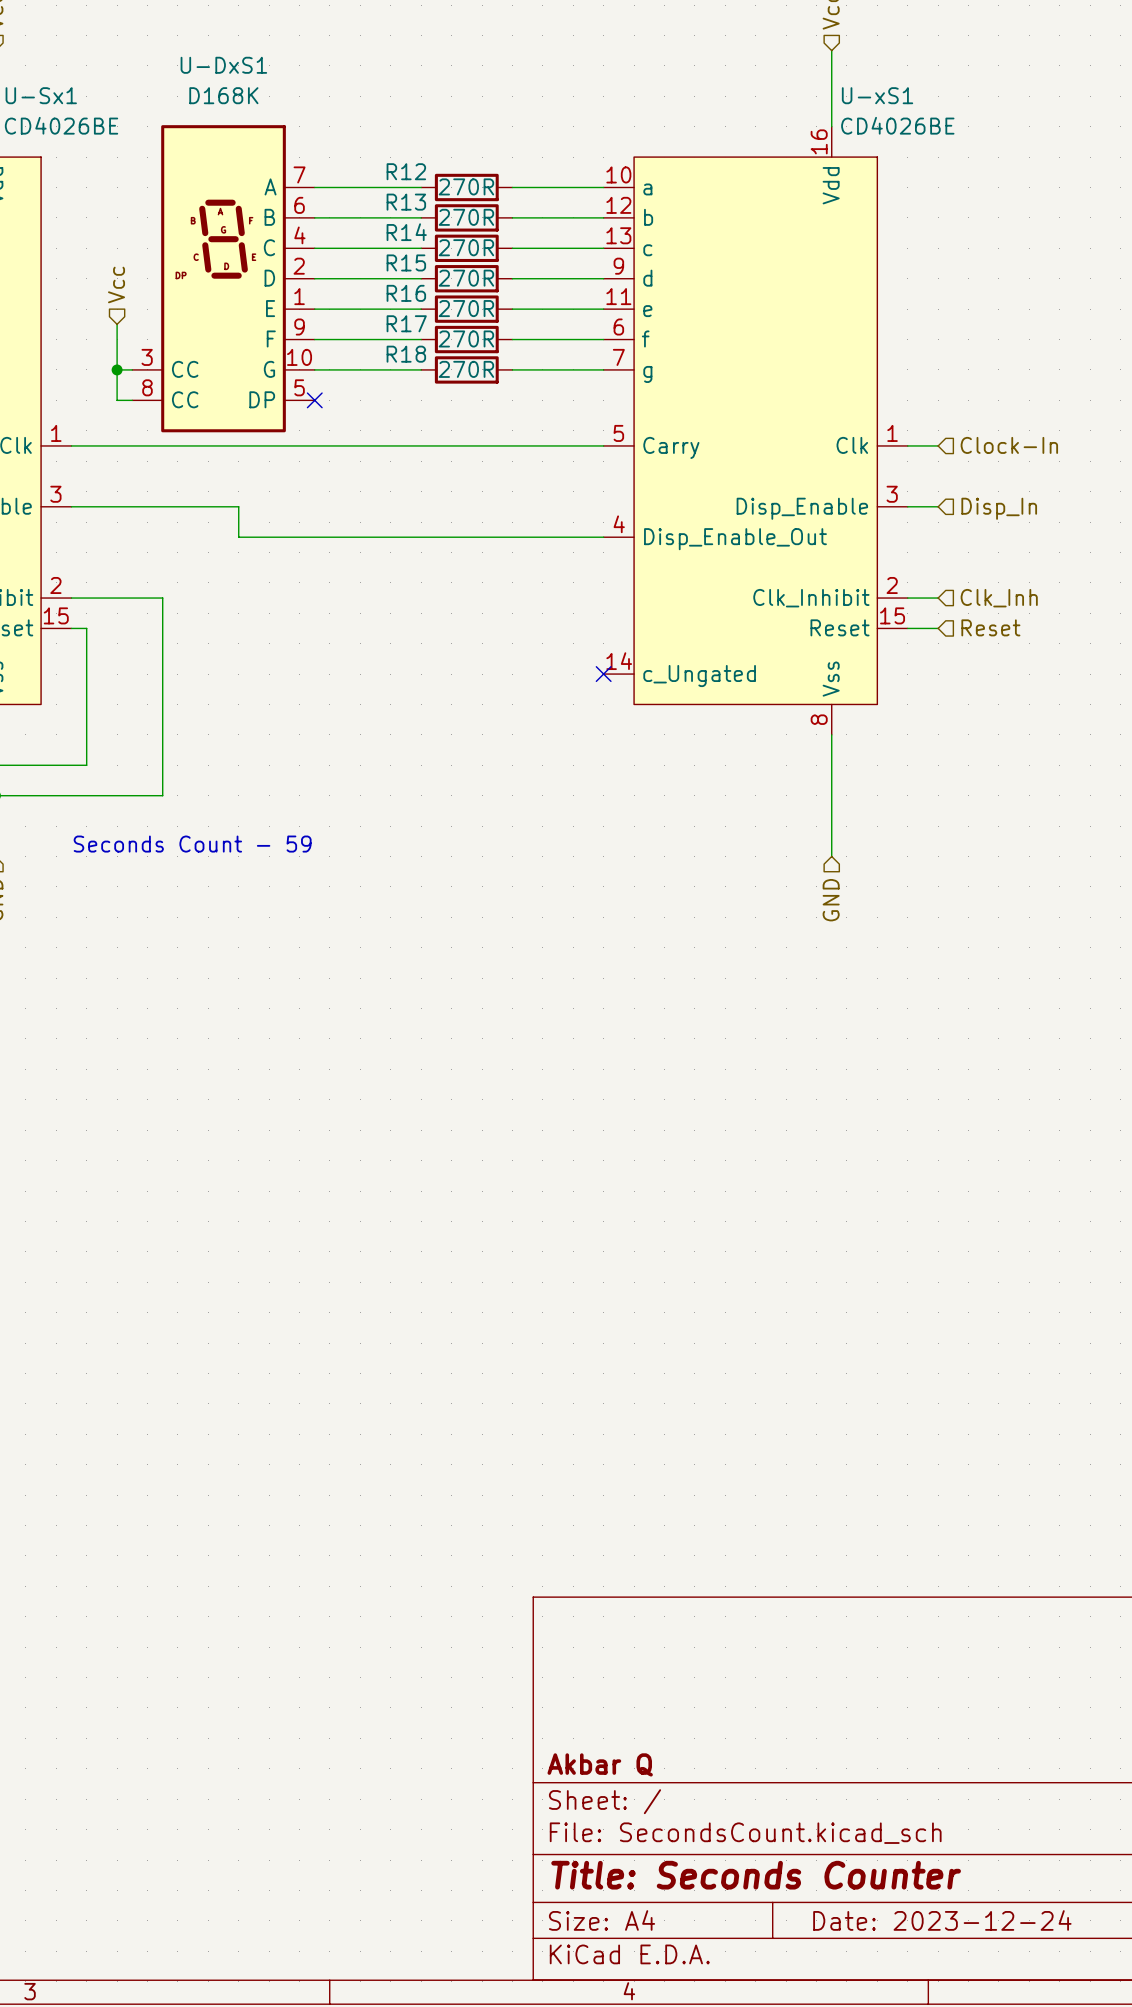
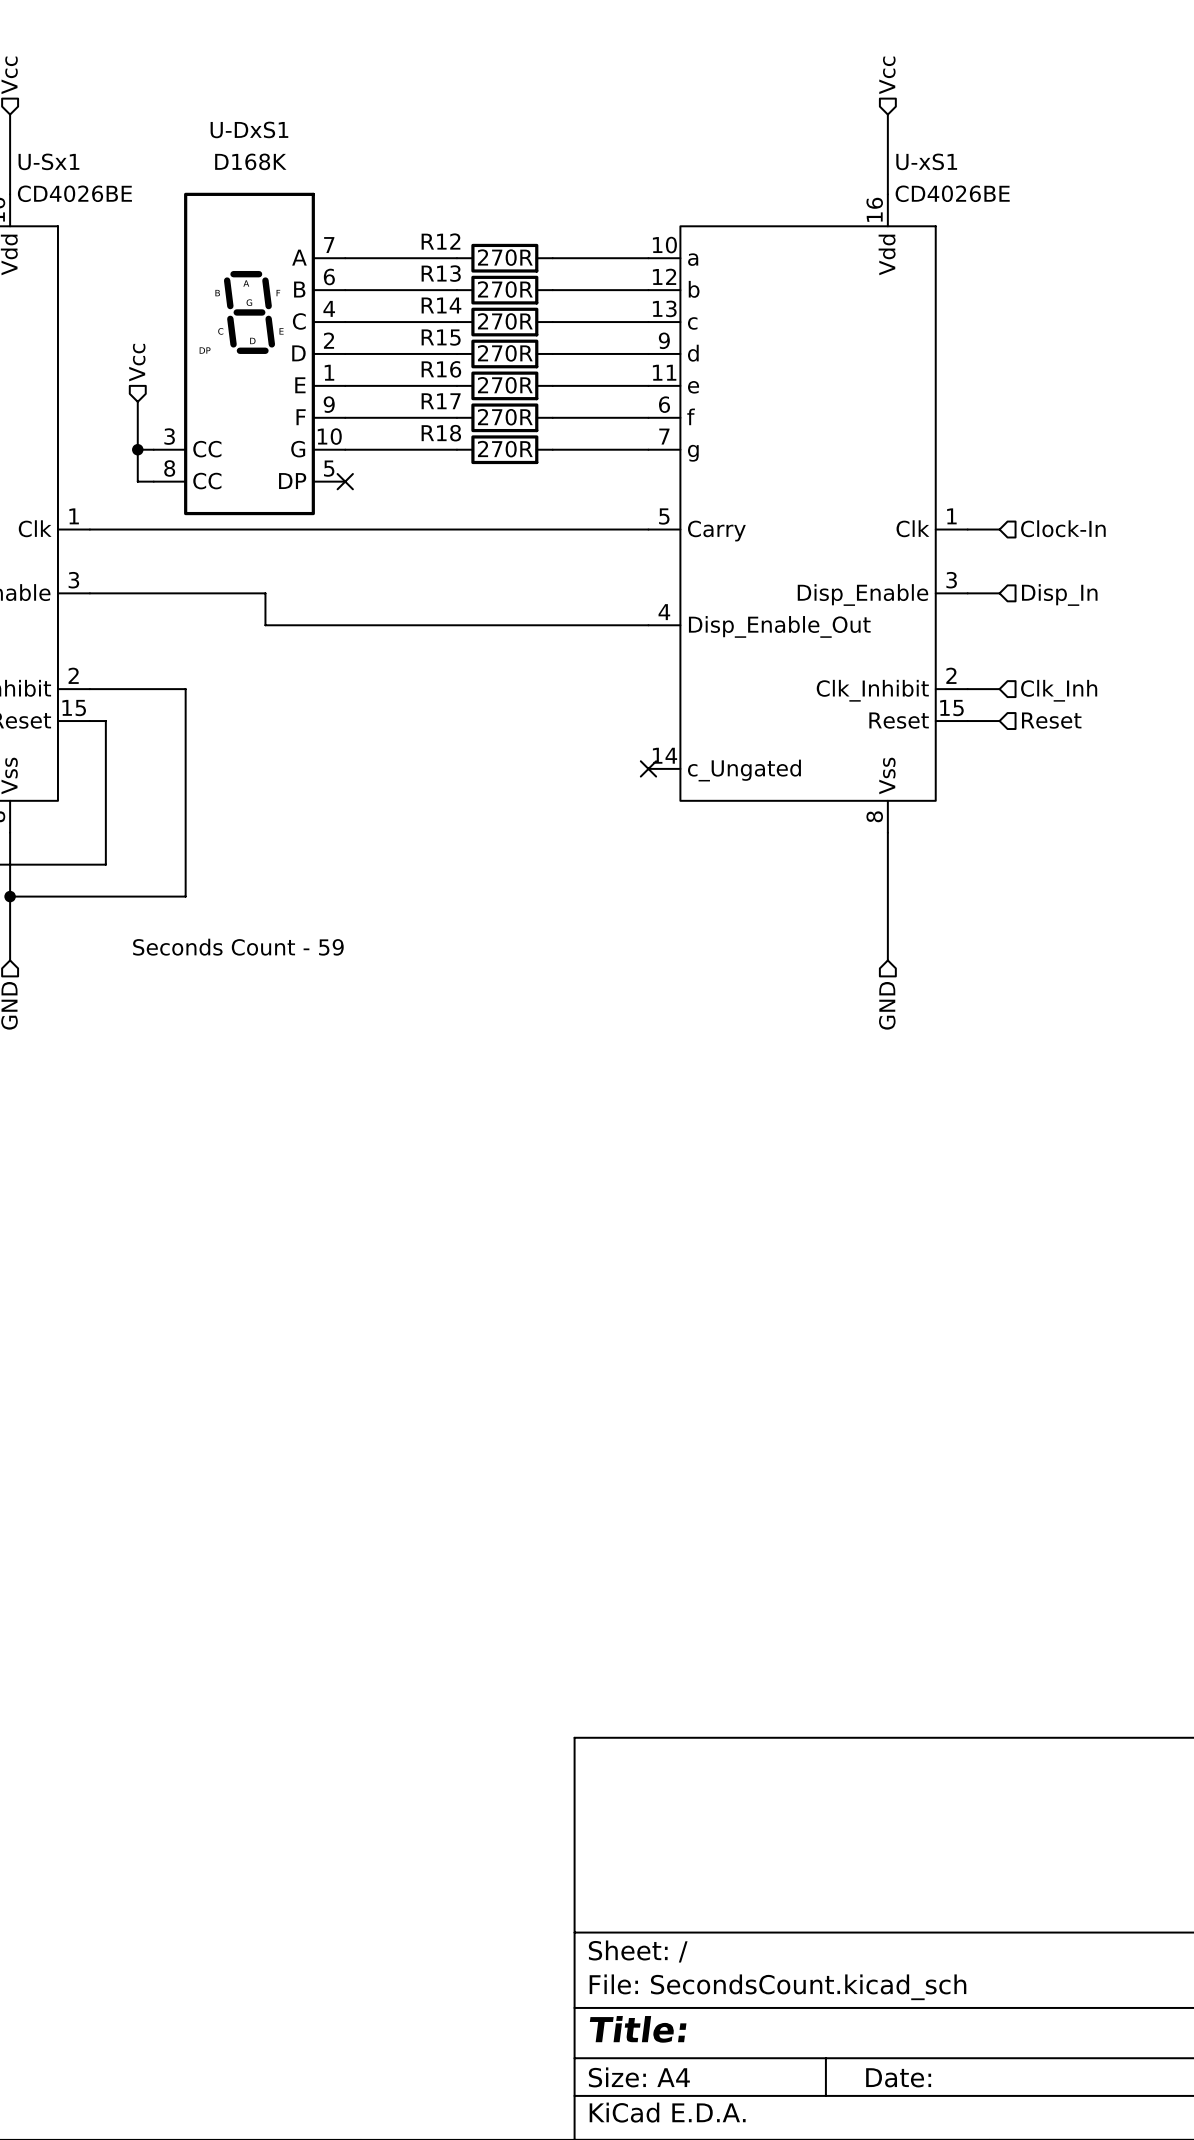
title block: Akbar Q (600, 1764) -> none
title block: Title: Seconds Counter (756, 1875) -> Title: (638, 2029)
title block: Date: 2023-12-24 (942, 1920) -> Date: (898, 2077)

